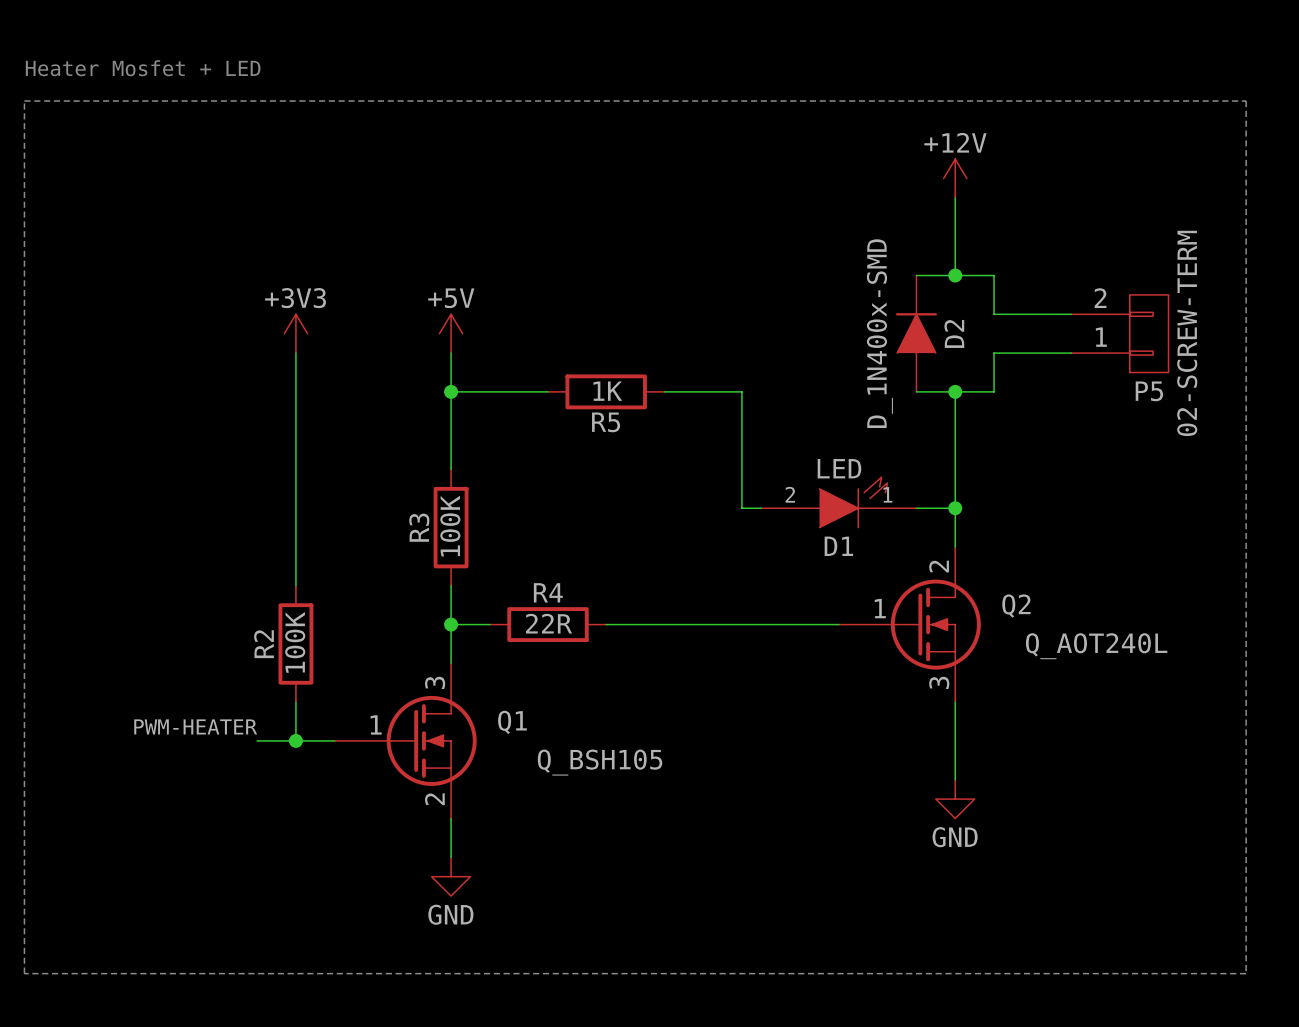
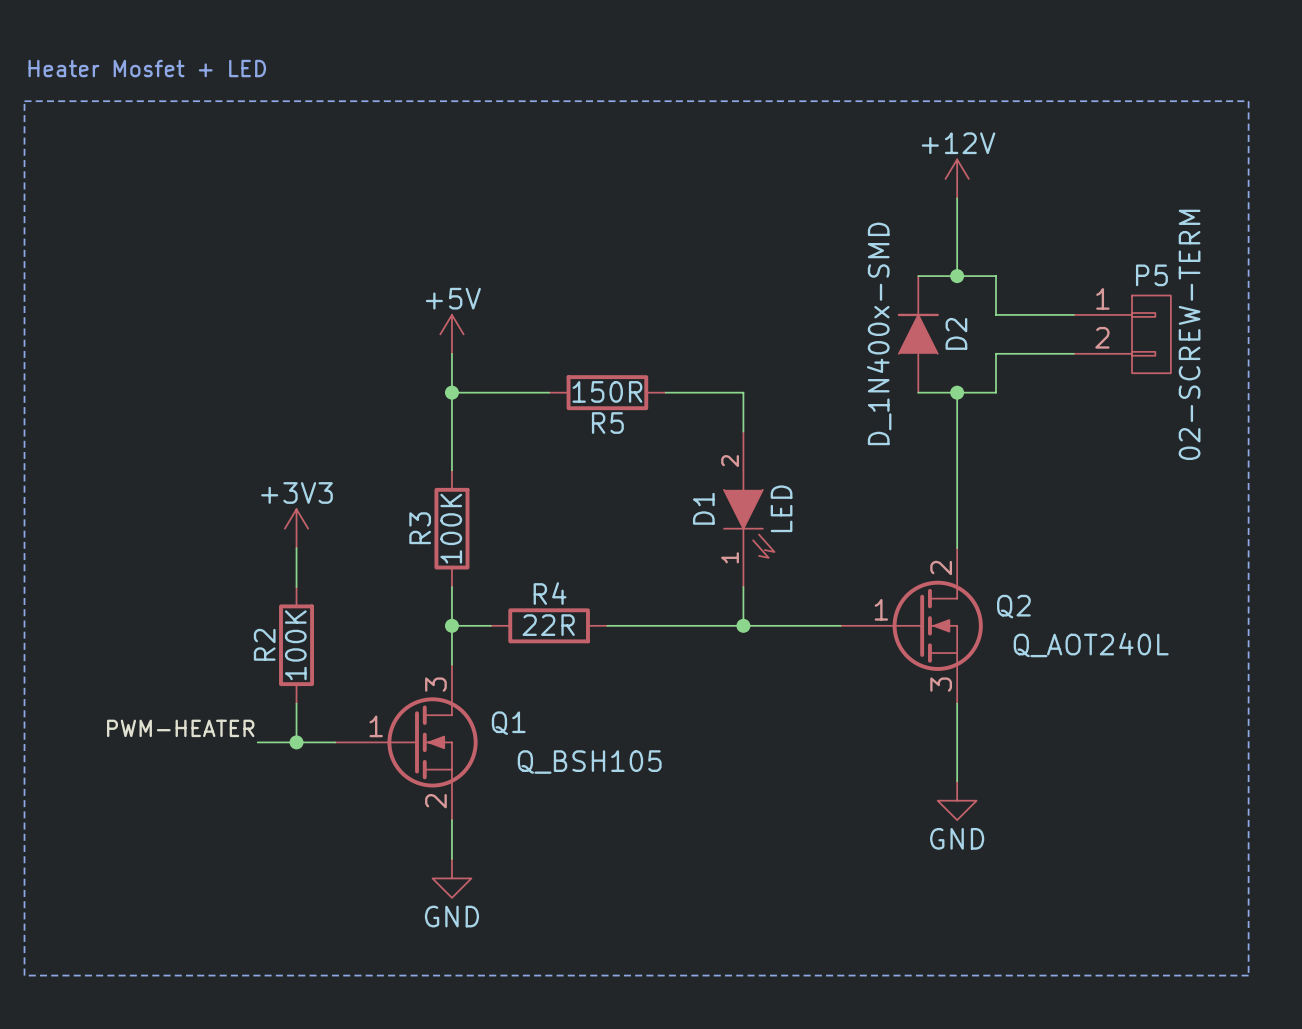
power symbol position: +3V3 (295, 333) -> +3V3 (296, 528)
P5 flip: as is (1149, 333) -> up-down (1151, 334)
wire: (295, 353) (295, 547) -> none
R5 value: 1K (607, 391) -> 150R (607, 391)
D1 rotation: 0° (853, 502) -> 90° clockwise (749, 523)
wire: (916, 508) (955, 508) -> none
junction: (955, 508) -> none
wire: none -> (743, 586) (743, 625)
junction: none -> (743, 625)

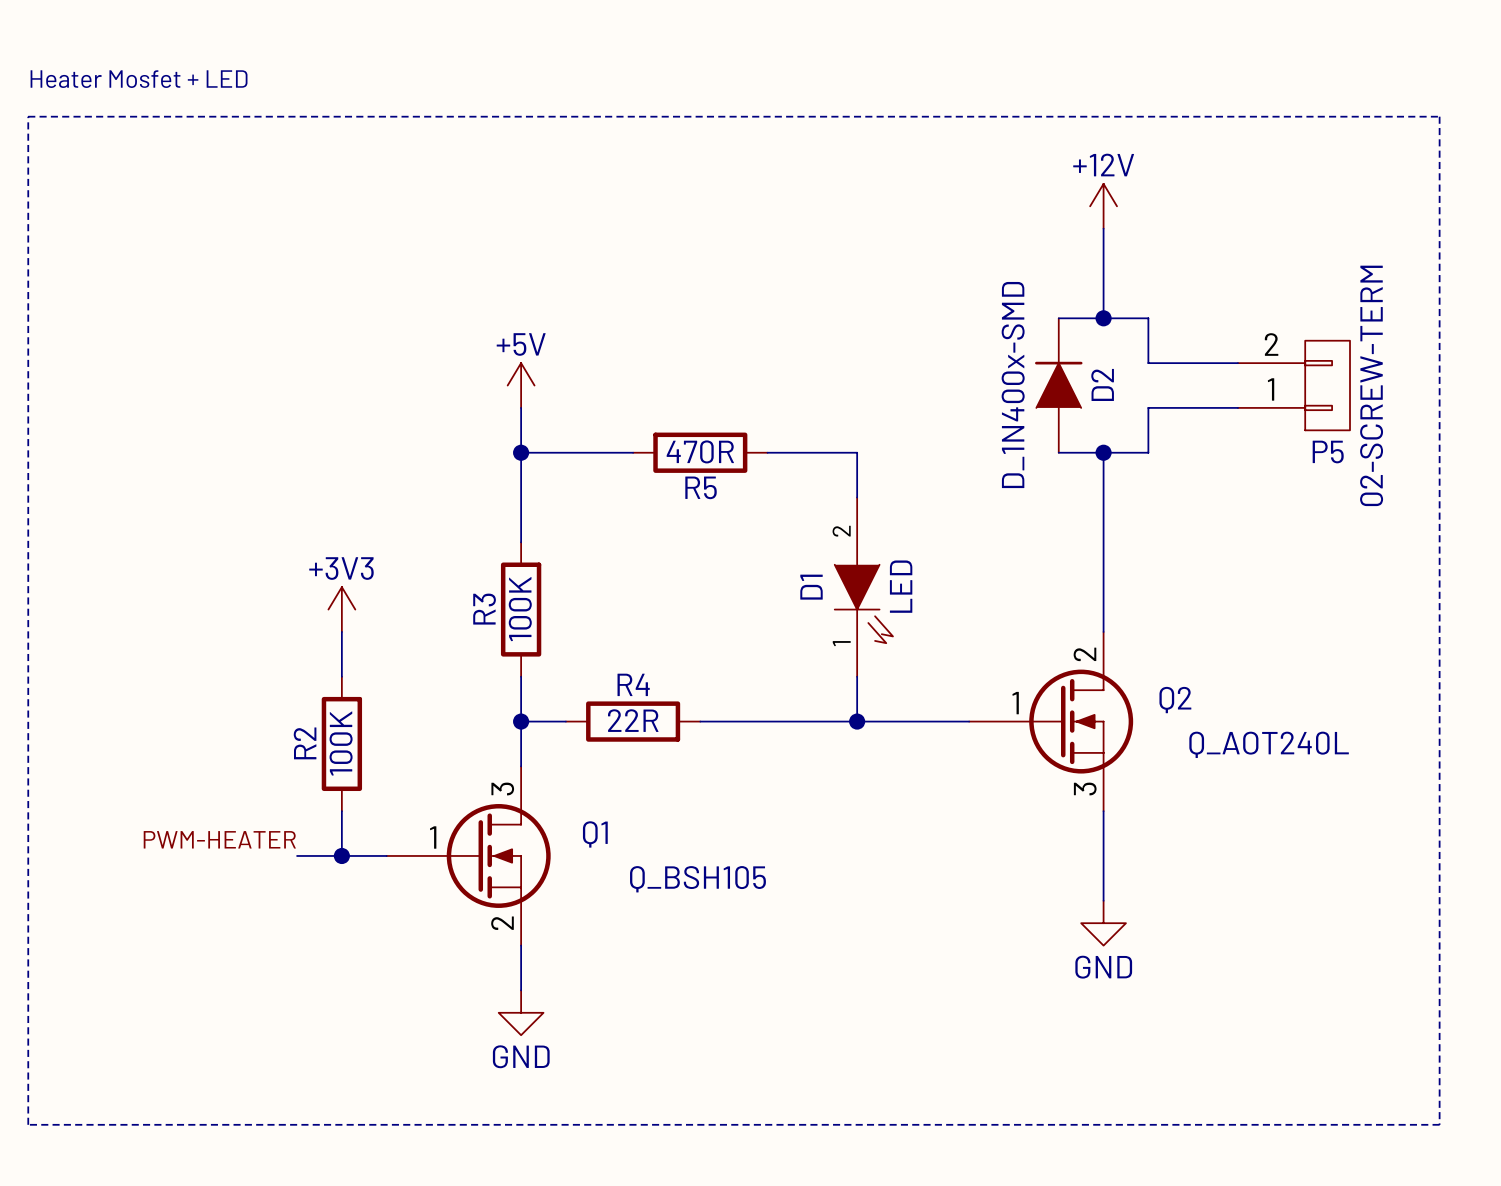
P5 flip: as is (1151, 334) -> up-down (1327, 385)
R5 value: 150R (607, 391) -> 470R (700, 451)

